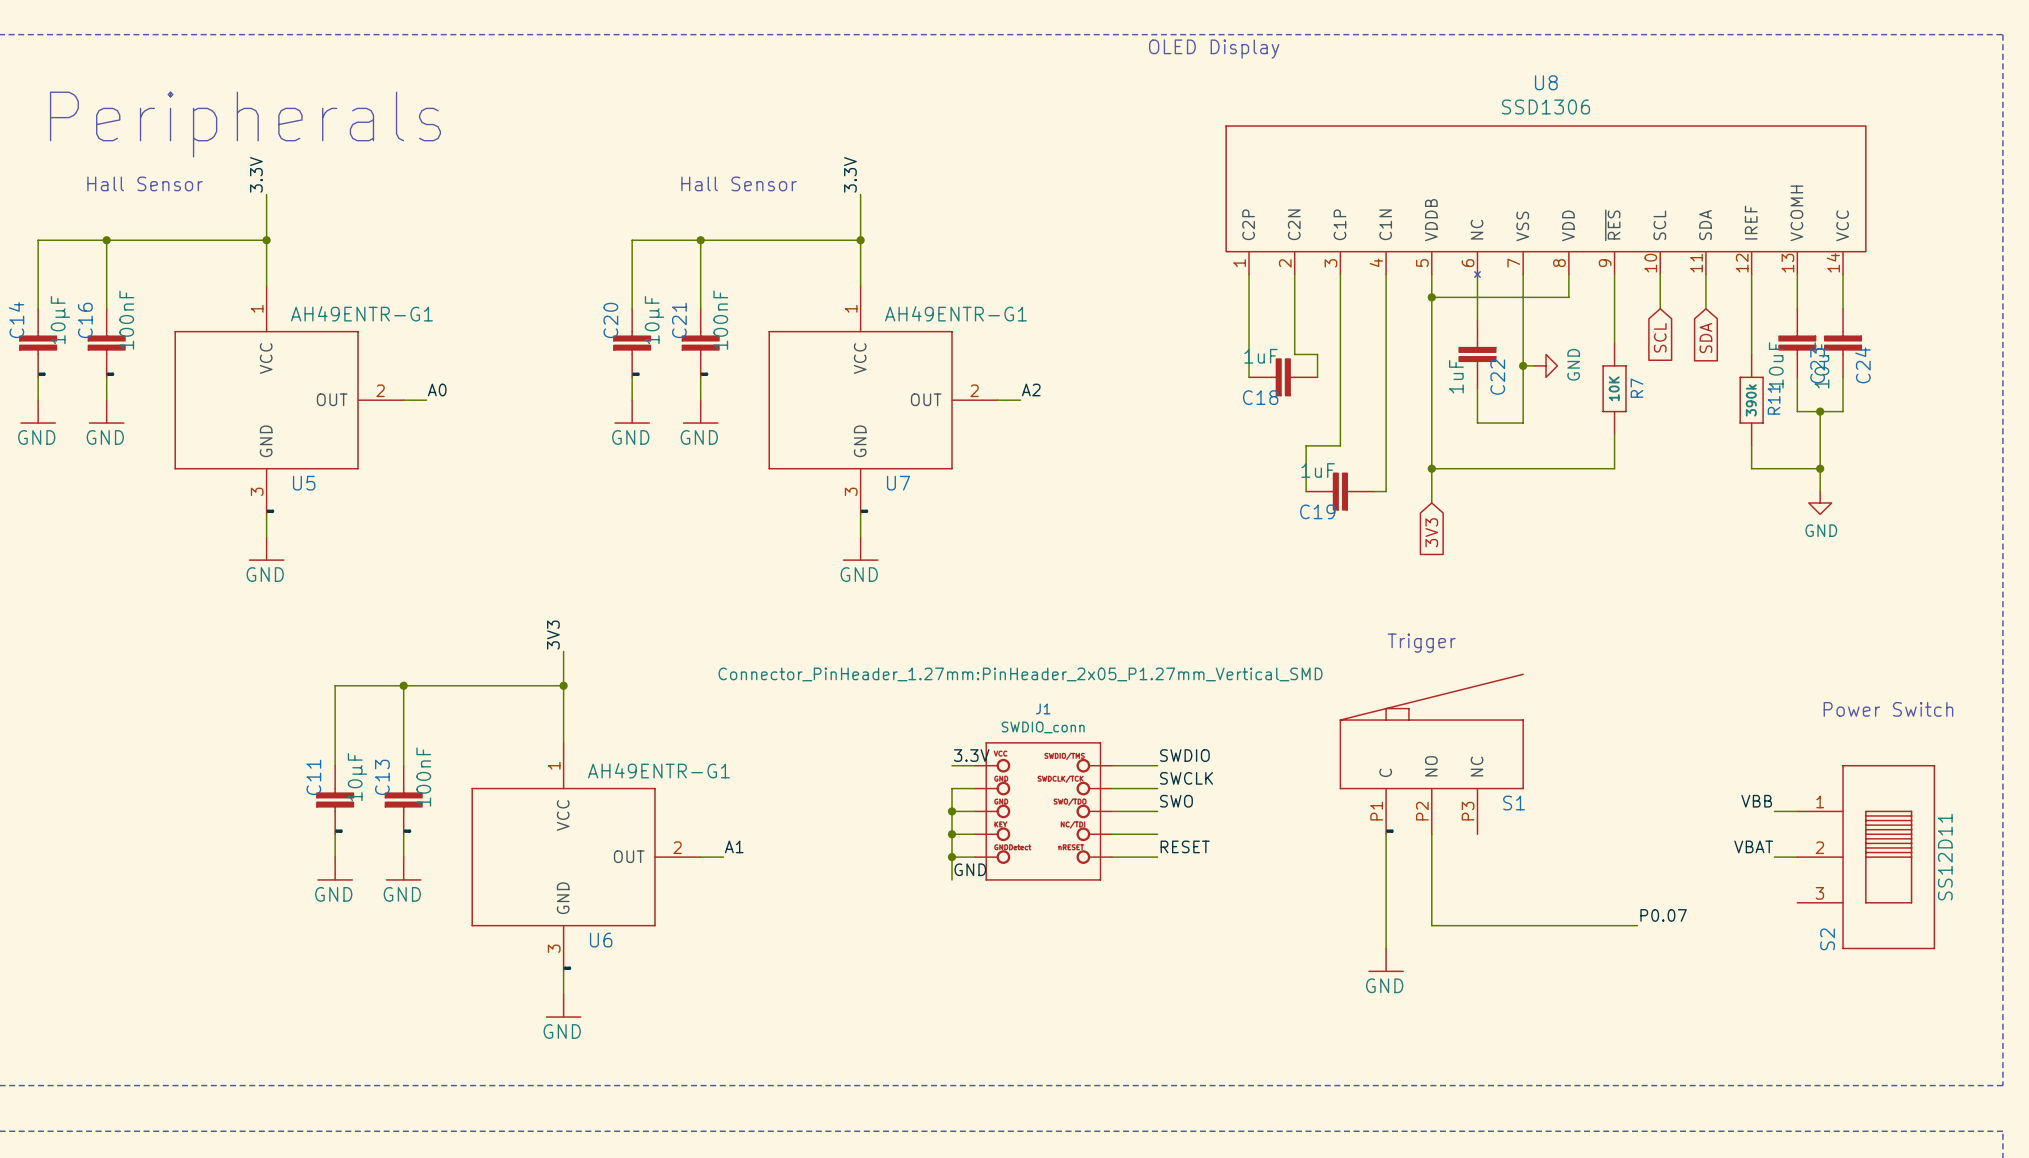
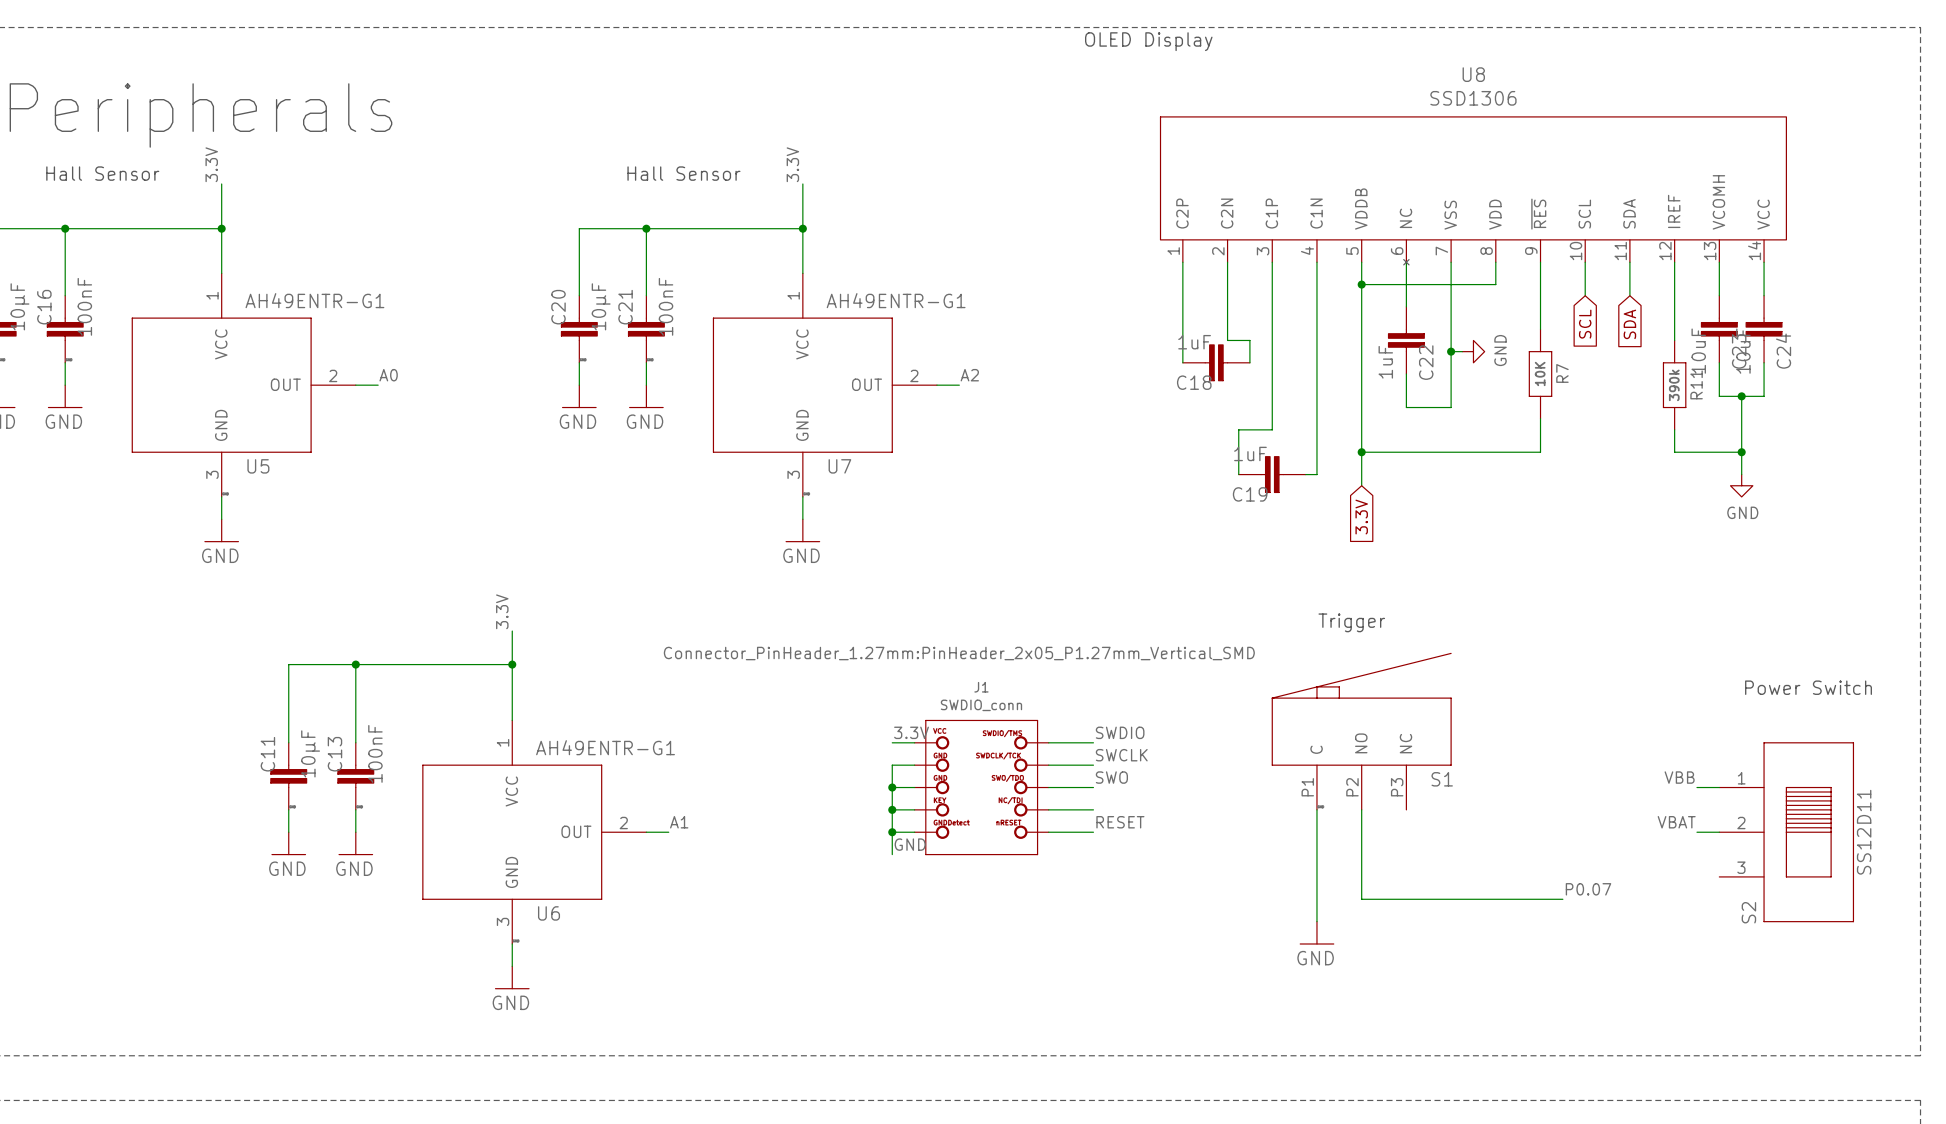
global label: 3V3 (1431, 532) -> 3.3V (1361, 517)
label: 3V3 (553, 635) -> 3.3V (502, 611)

